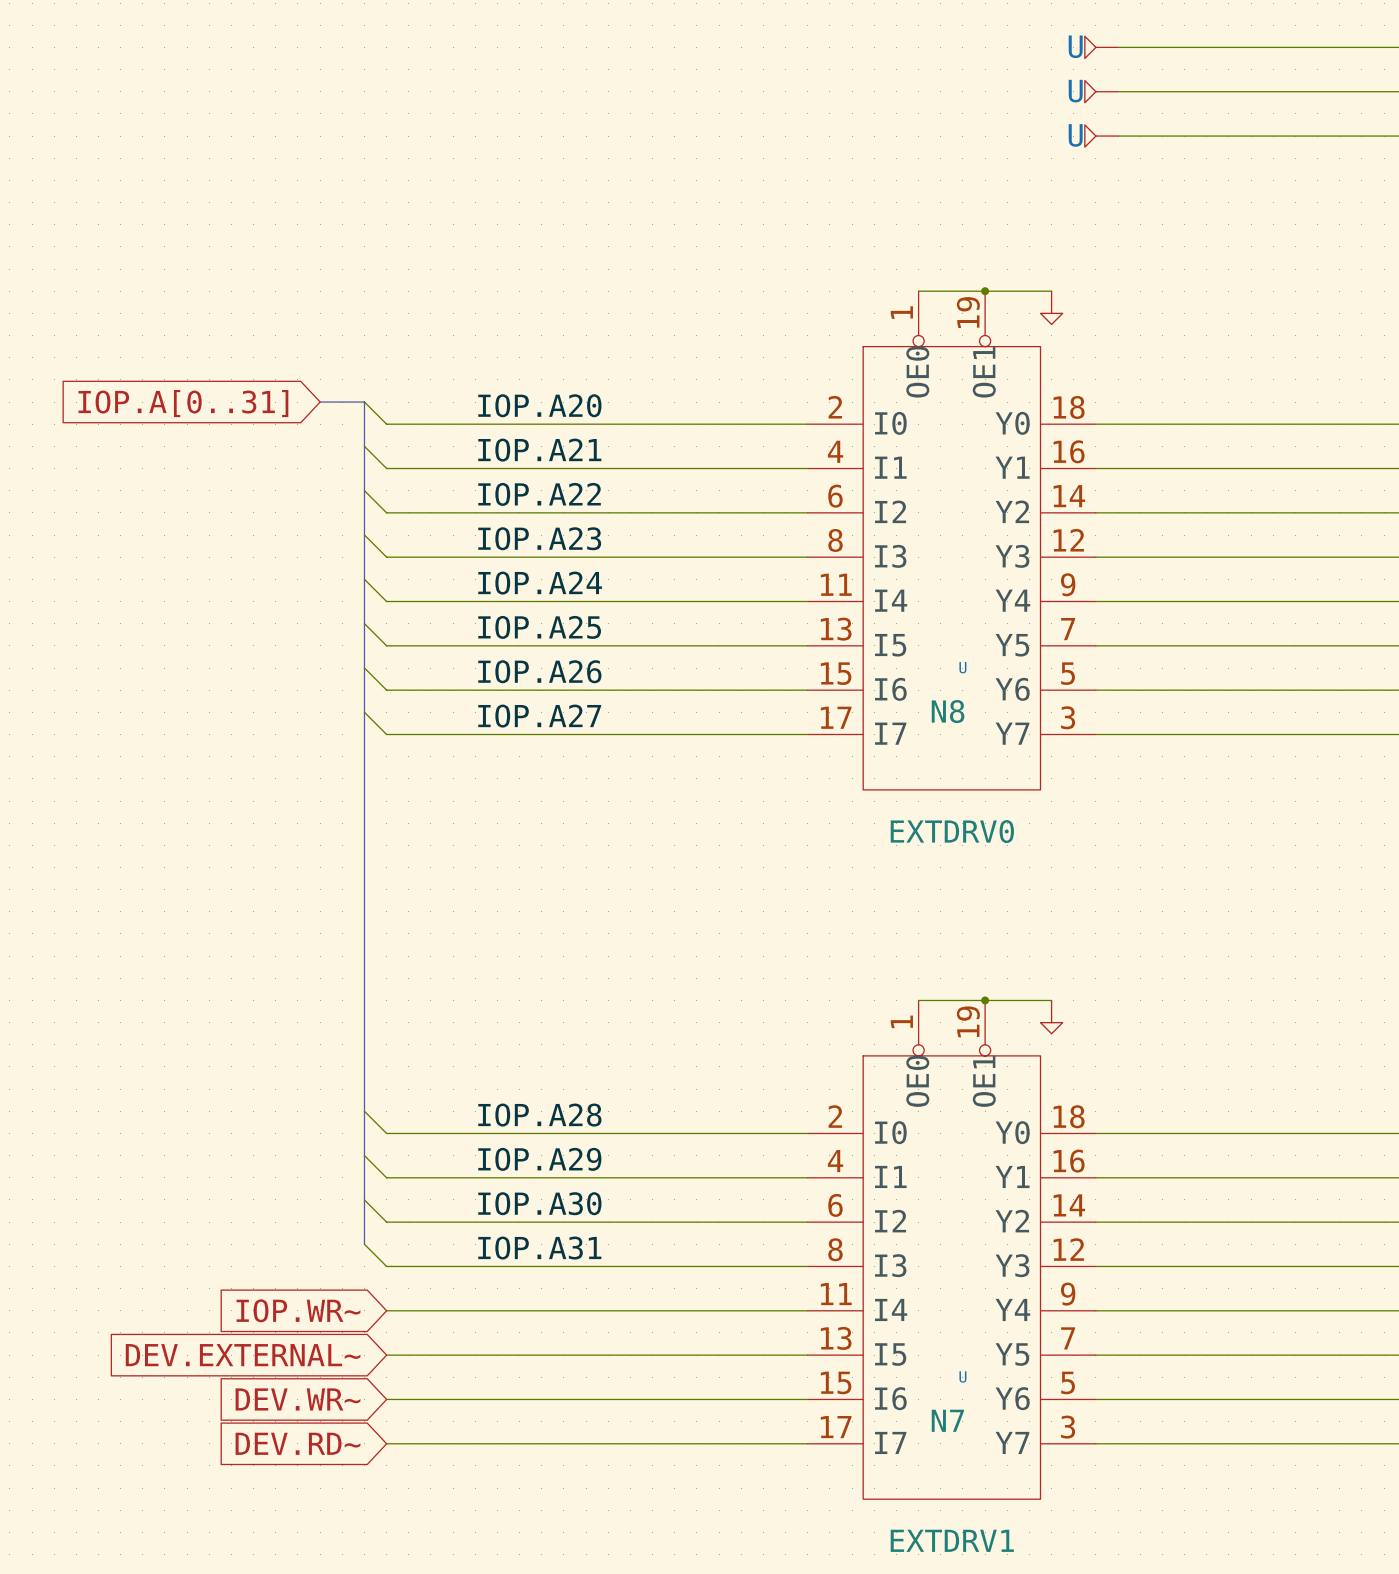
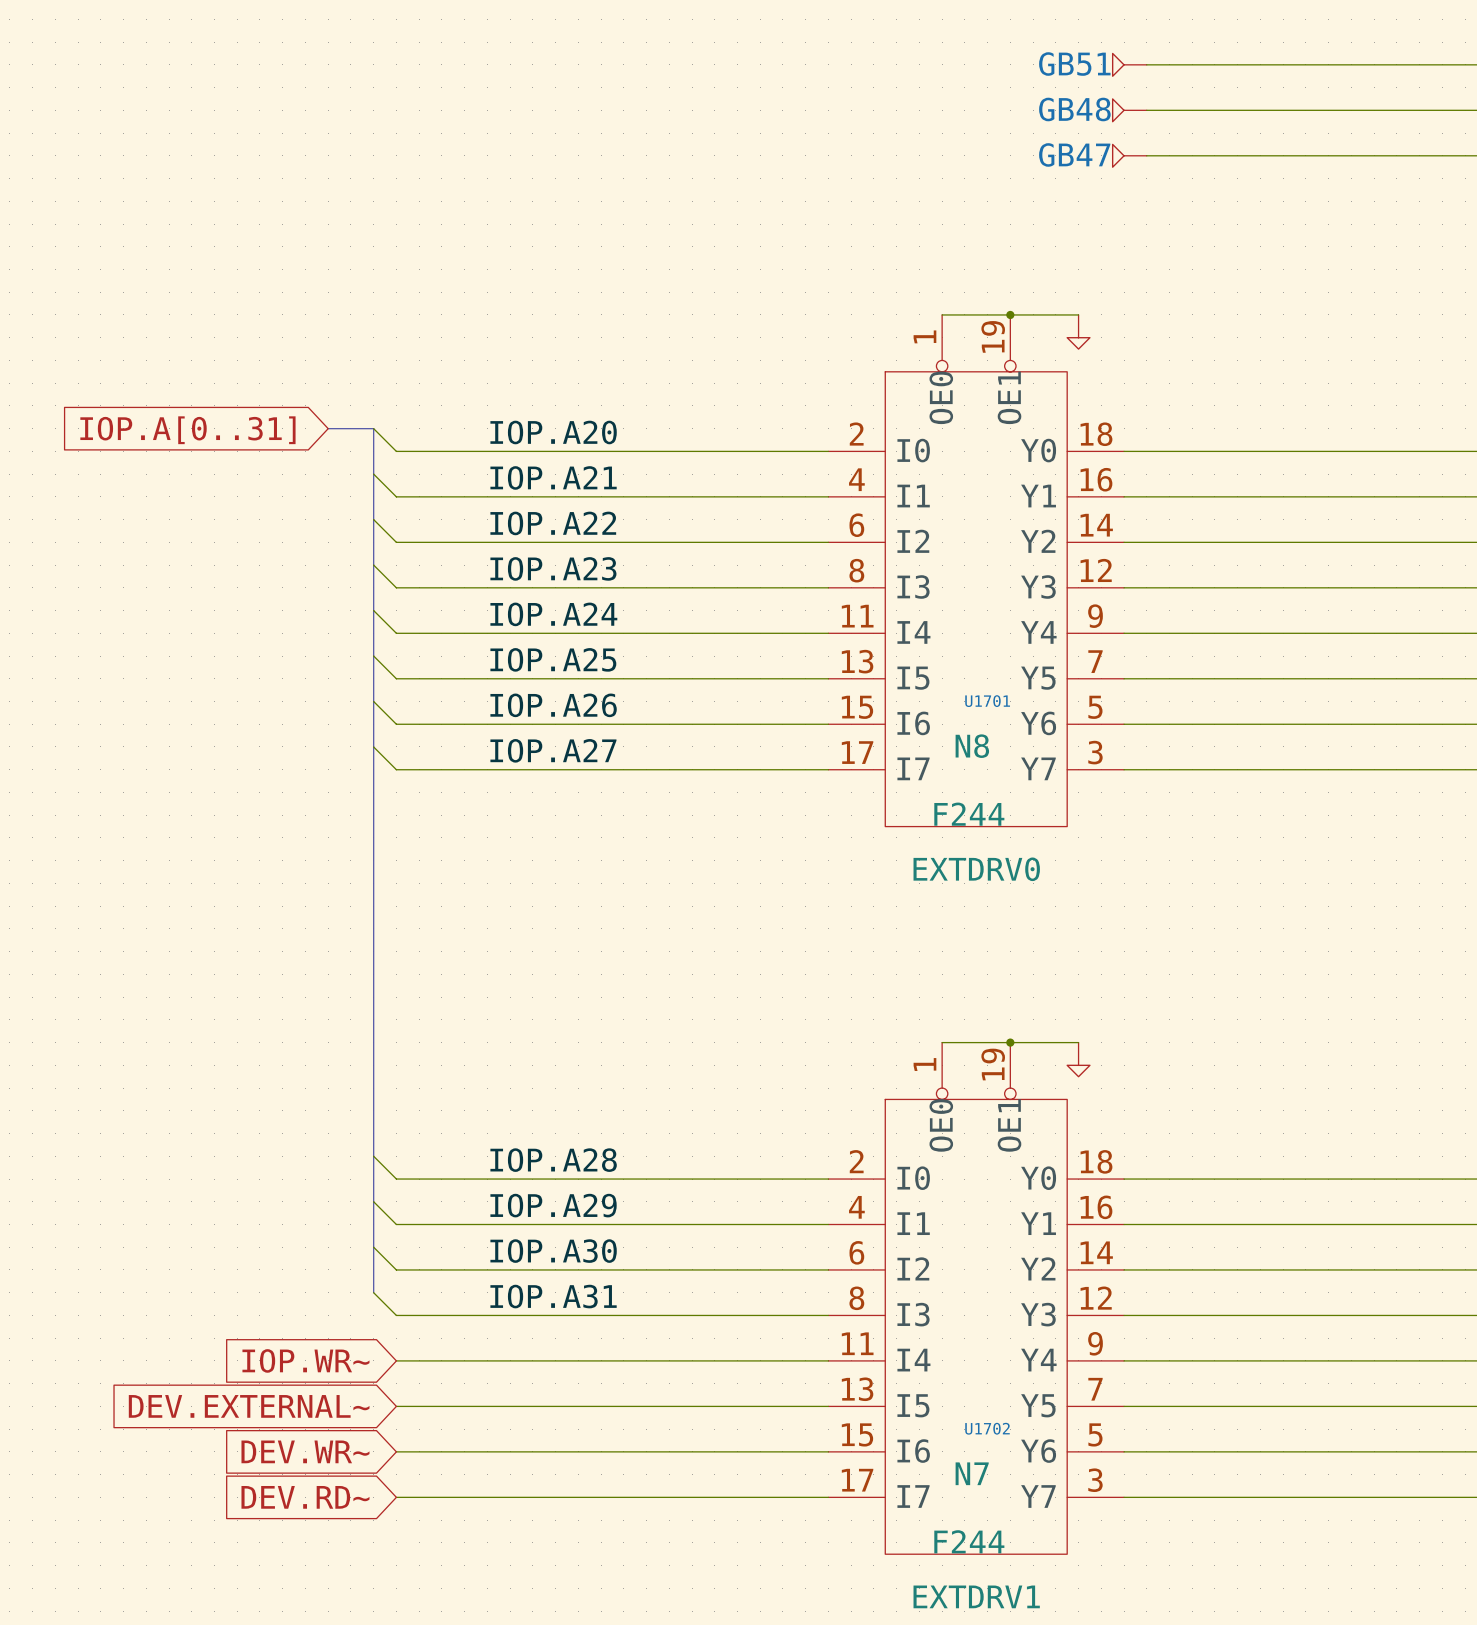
U name: U (1075, 46) -> GB51 (1074, 64)
U name: U (1075, 91) -> GB48 (1074, 109)
U name: U (1075, 135) -> GB47 (1074, 154)
U name: U (962, 667) -> U1701 (987, 701)
U value: none -> F244 (969, 814)
U name: U (962, 1376) -> U1702 (987, 1428)
U value: none -> F244 (969, 1541)

